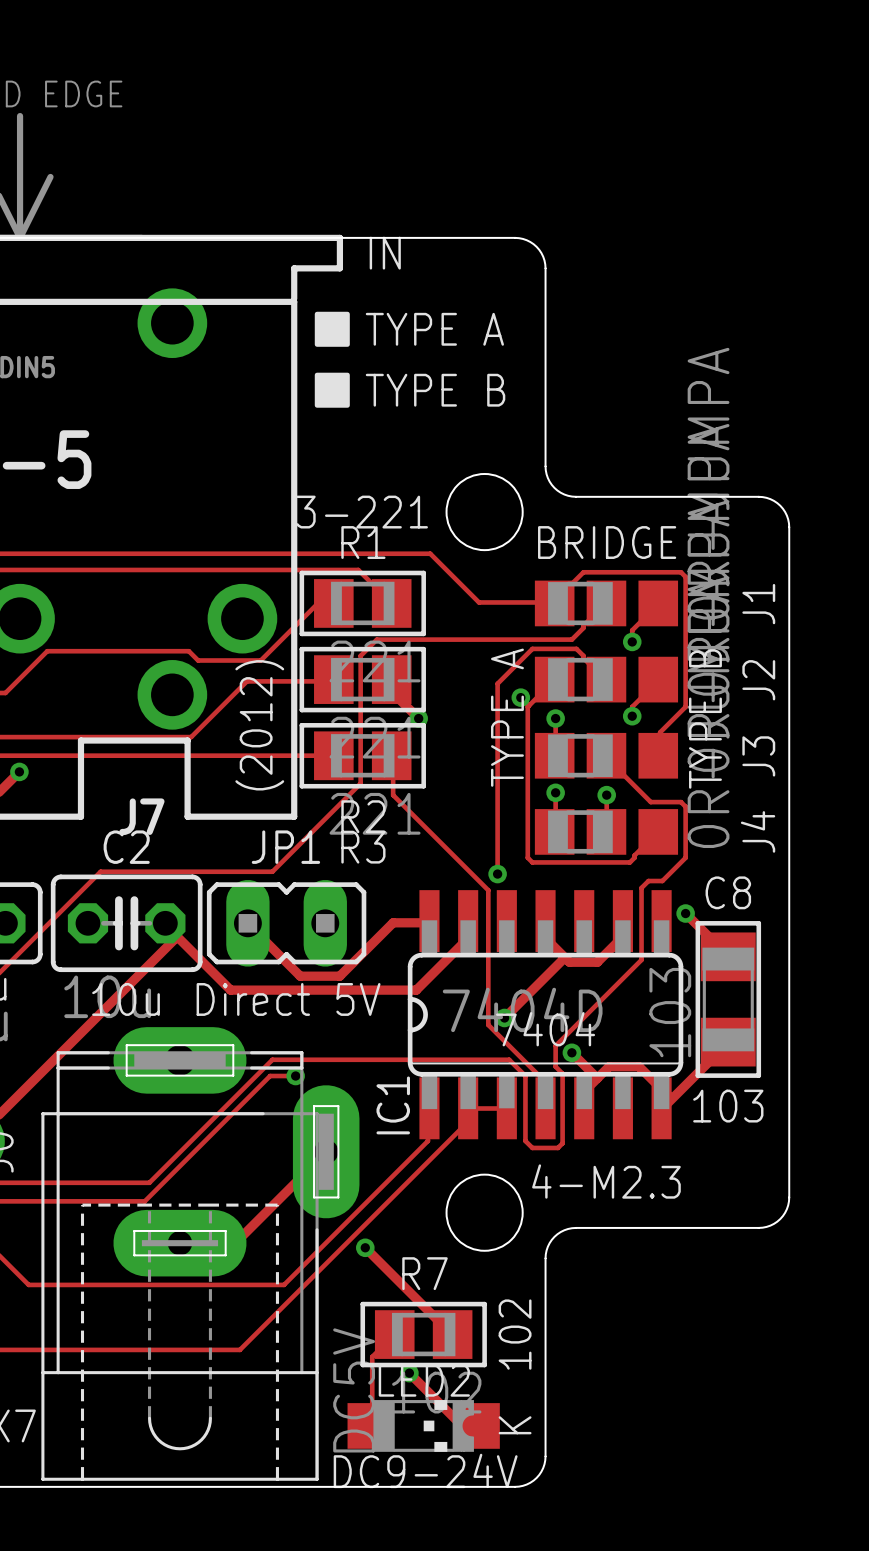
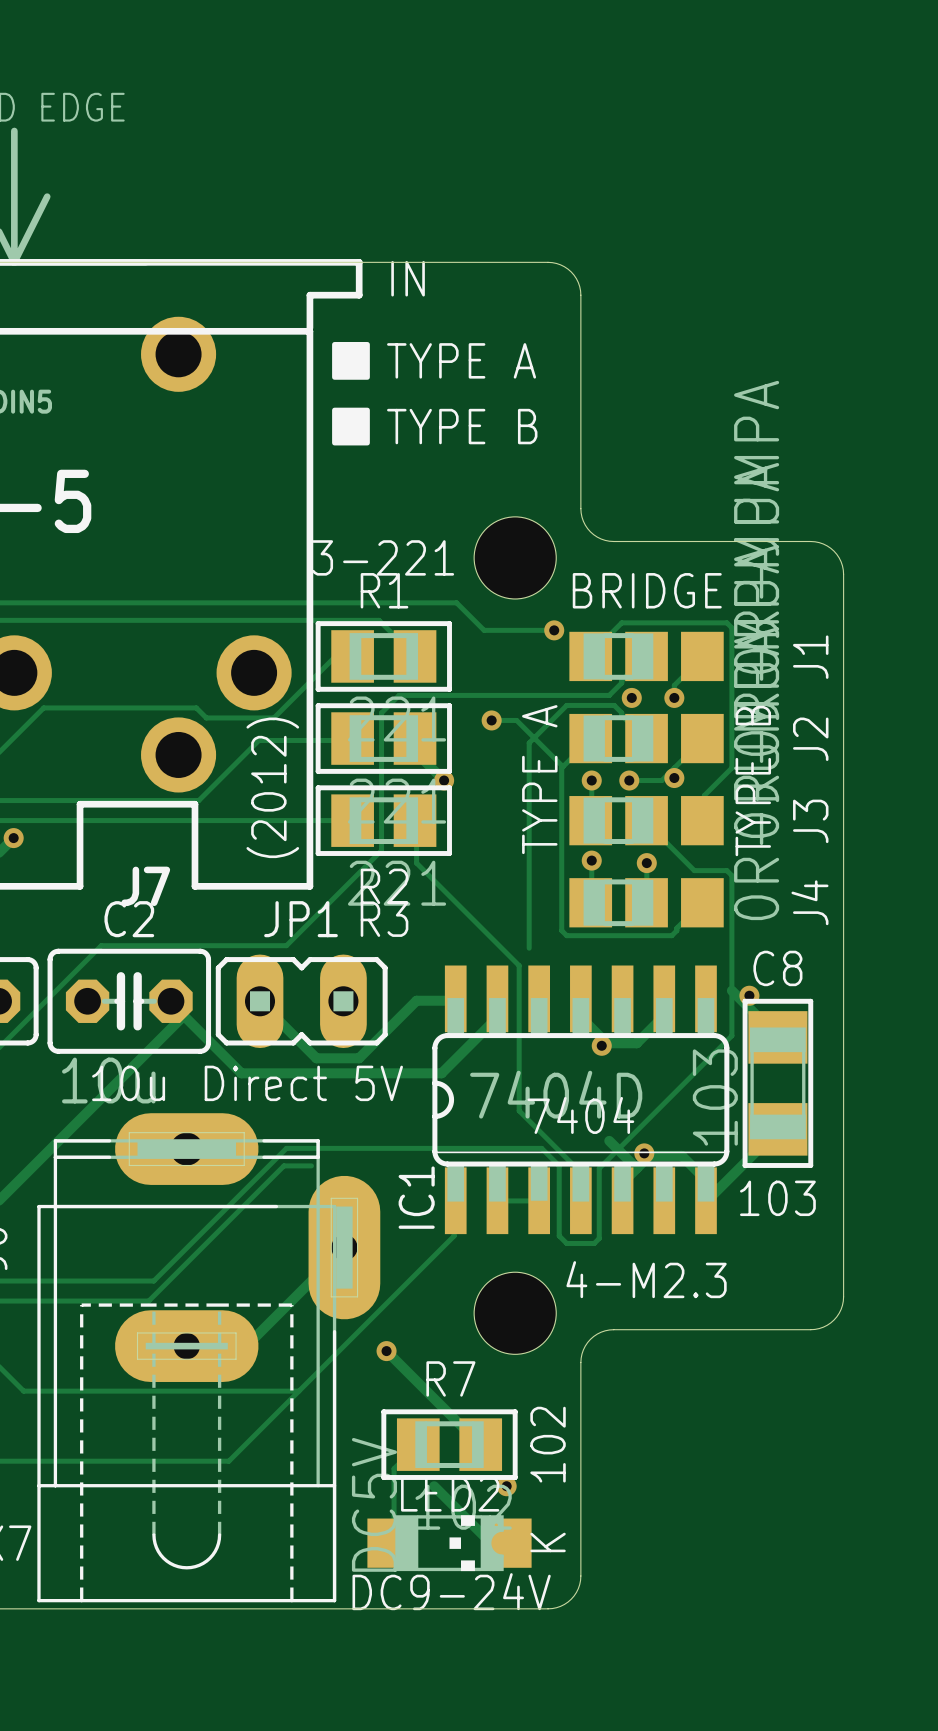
track: (455, 579) (479, 602) (551, 602) -> (484, 630) (554, 630)
via: none -> (554, 630)
via: none -> (631, 697)
track: none -> (491, 720) (516, 720) (554, 757)
via: none -> (491, 720)
via: (520, 697) -> none
track: none -> (674, 768) (661, 780) (629, 780)
via: none -> (629, 780)
track: (685, 857) (662, 881) (648, 881) (641, 887) (641, 959) (555, 1045) (555, 1066) (562, 1073) (562, 1078) -> (731, 930) (731, 1035) (599, 1168)
via: (497, 874) -> none
via position: (685, 913) -> (749, 995)
track: (564, 957) (504, 1017) -> none
via: none -> (601, 1045)
via: (504, 1017) -> none
via position: (571, 1052) -> (644, 1153)
via: (295, 1076) -> none
track: (468, 1108) (467, 1122) (239, 1349) (219, 1349) -> (298, 1391) (228, 1461)
via position: (409, 1373) -> (506, 1486)

